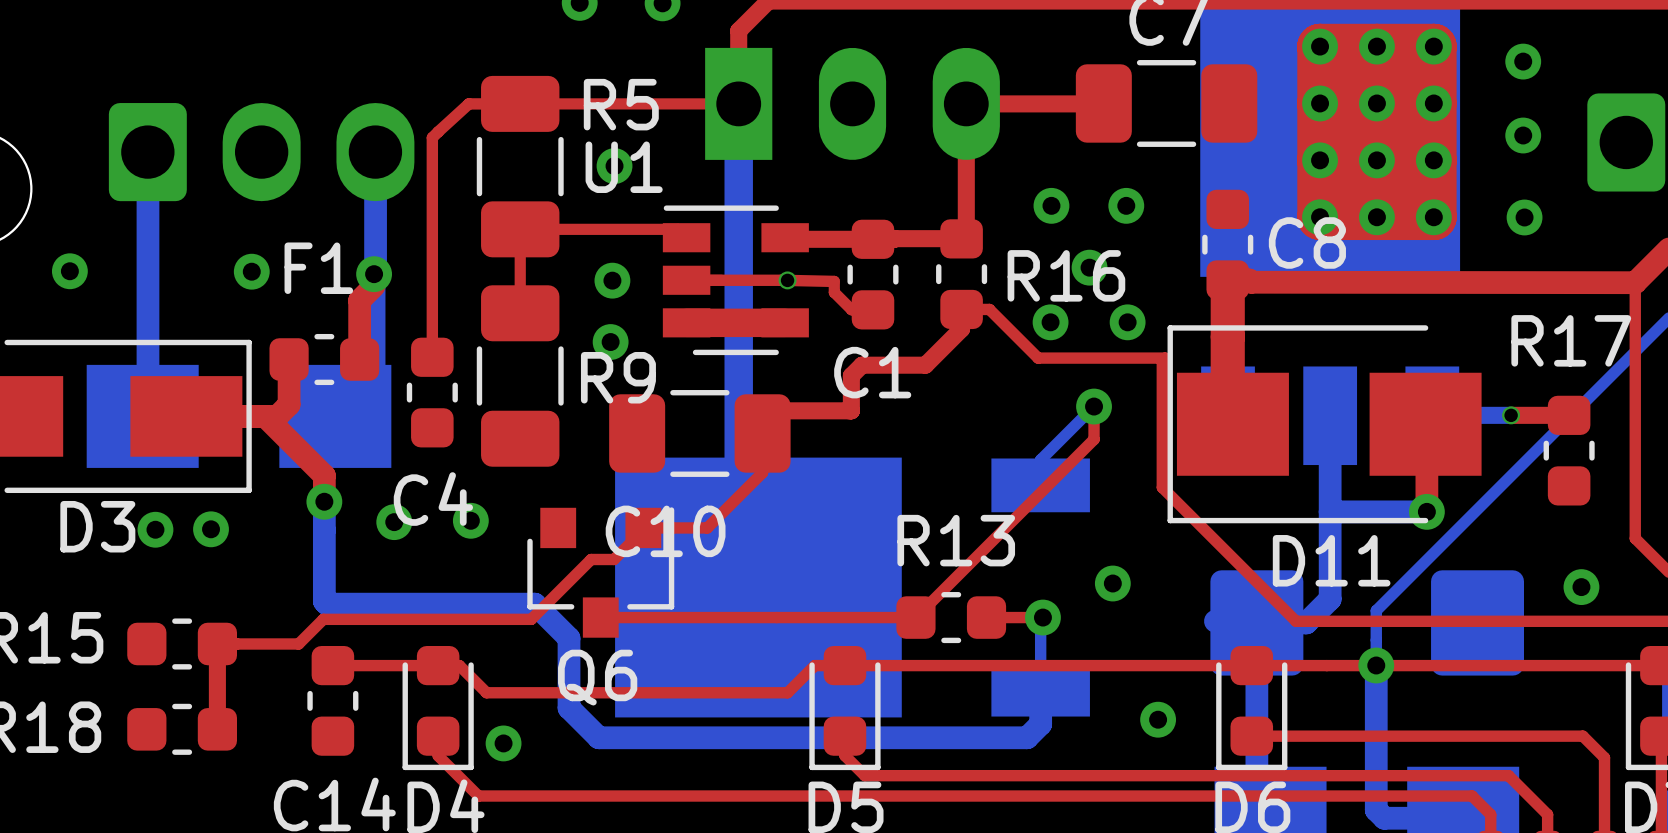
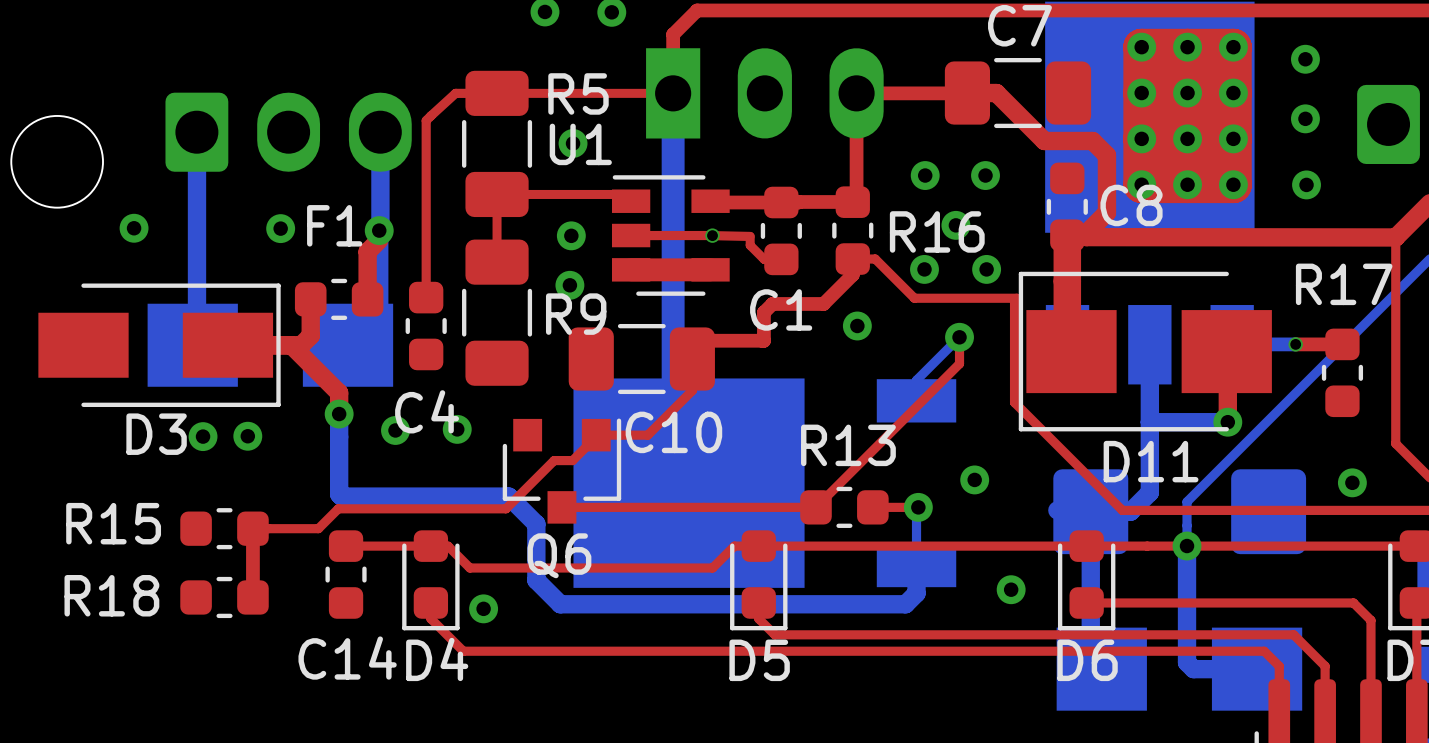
top track: none -> (967, 93) (996, 93) (1044, 141) (1092, 141) (1106, 155) (1106, 212) (1084, 235)
via: none -> (857, 325)
C10 name position: C10 (665, 531) -> C10 (673, 432)

